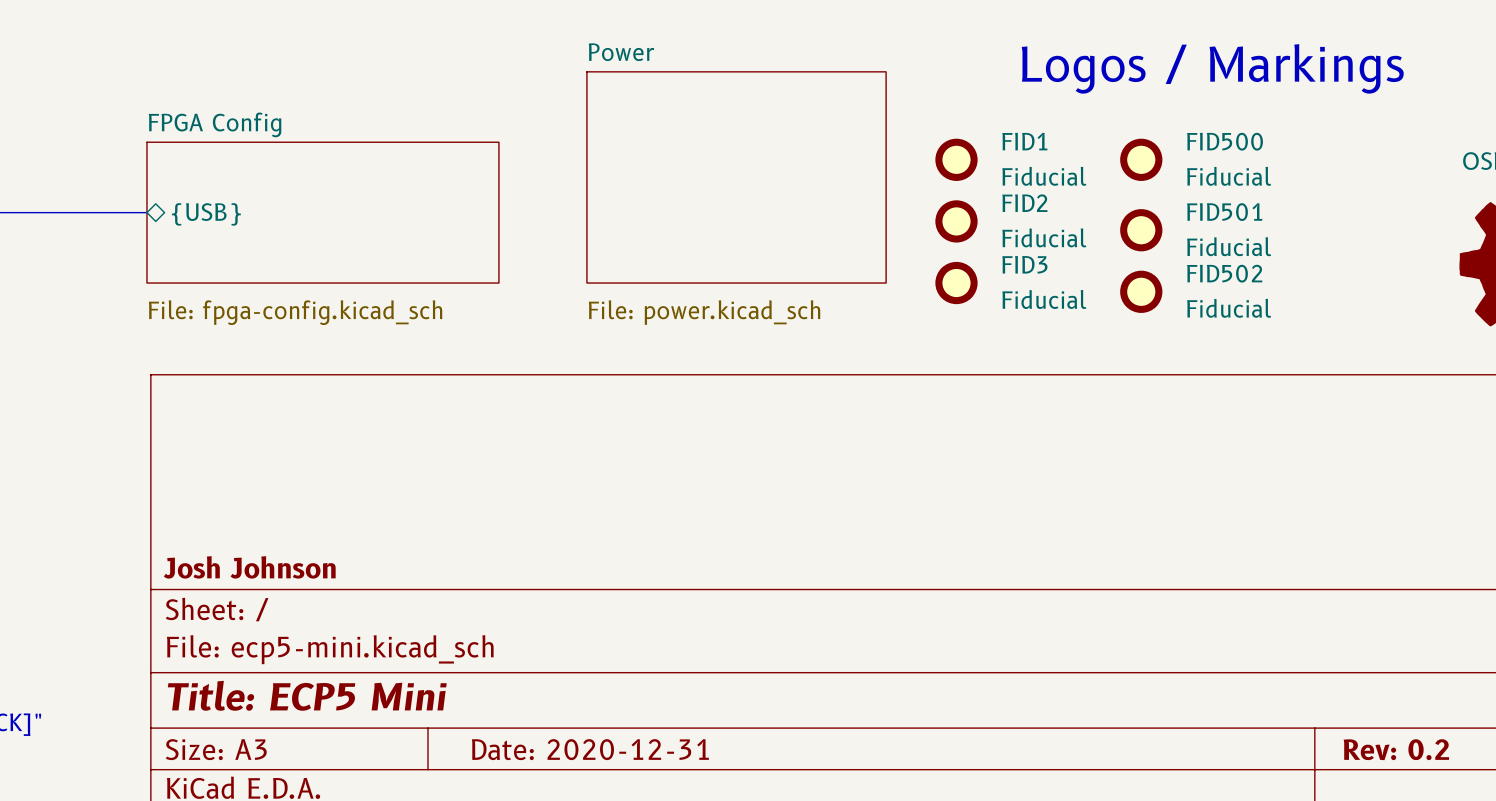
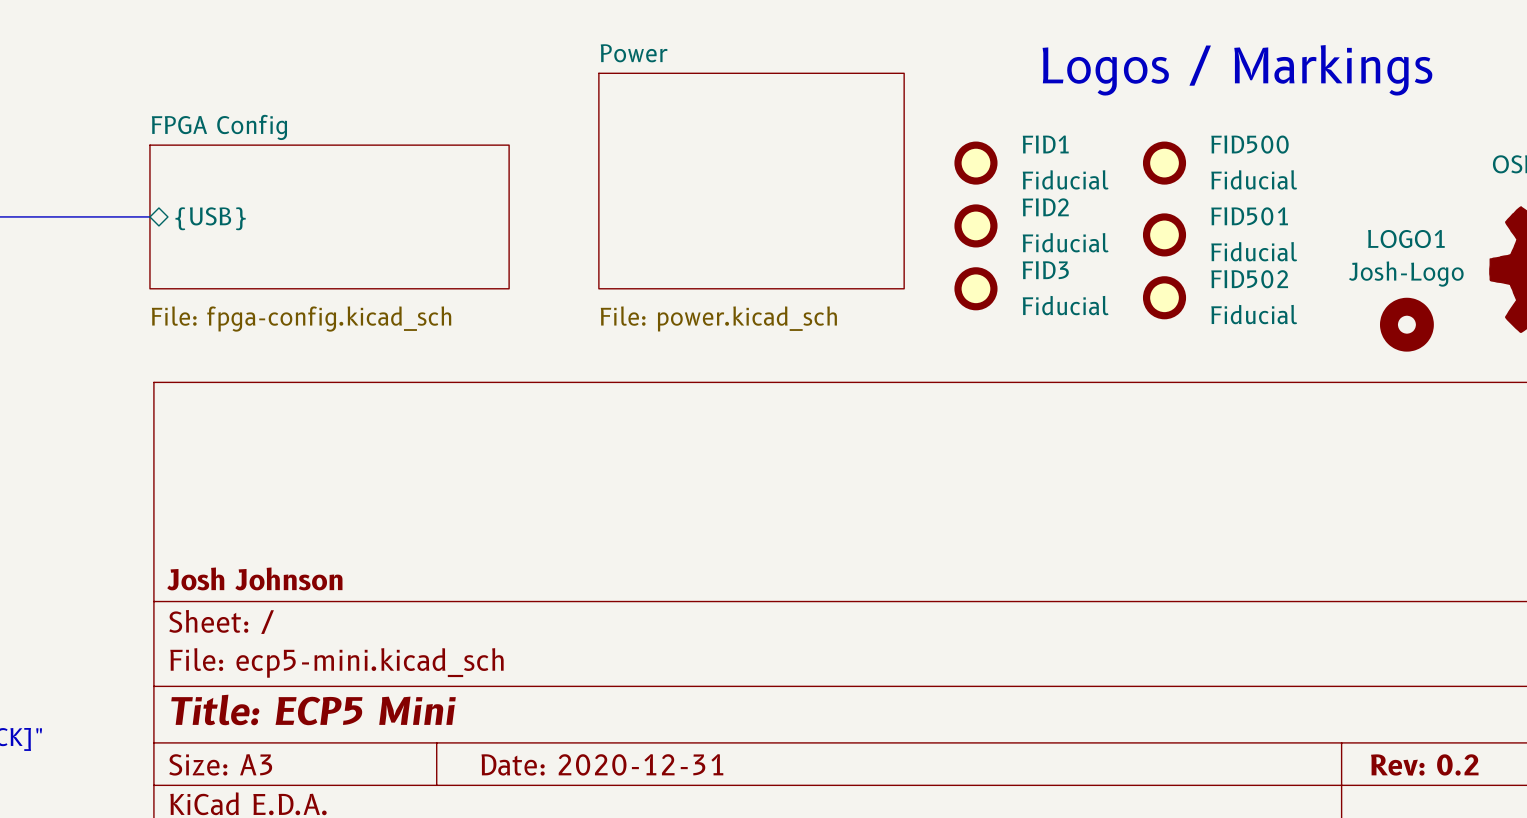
LOGO1: none -> Josh-Logo (1406, 324)

